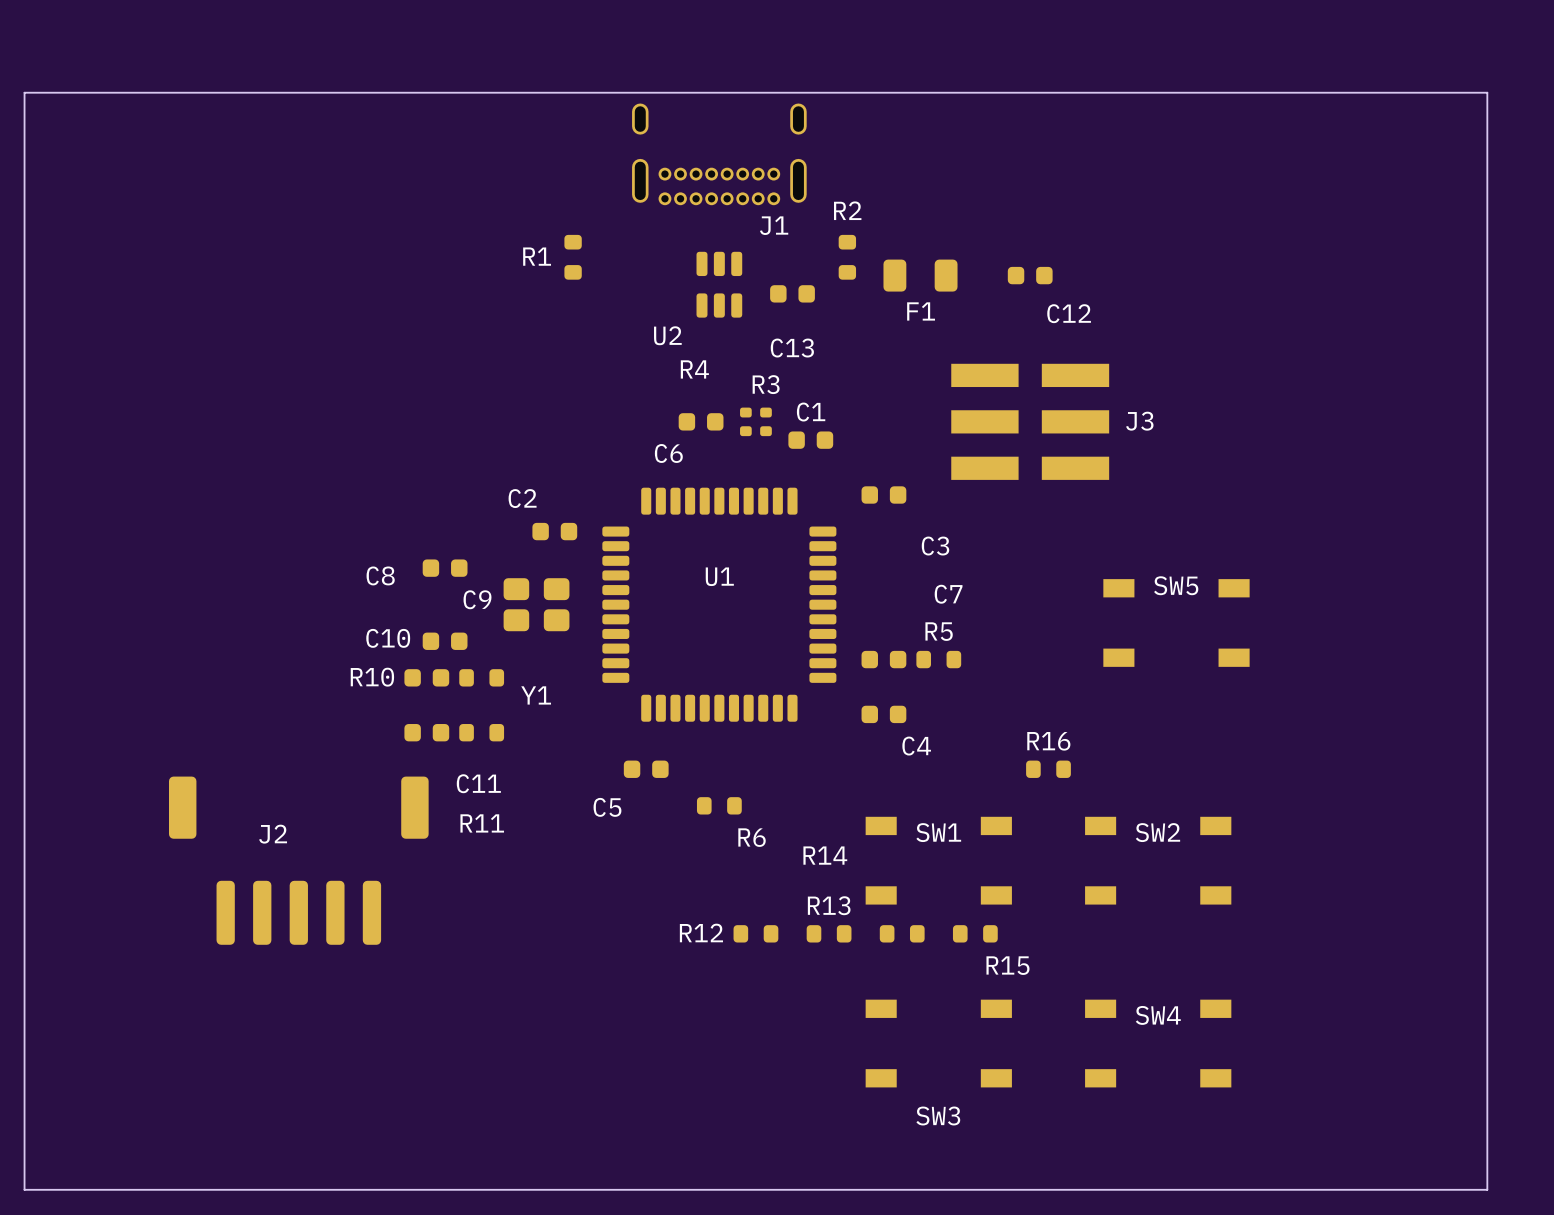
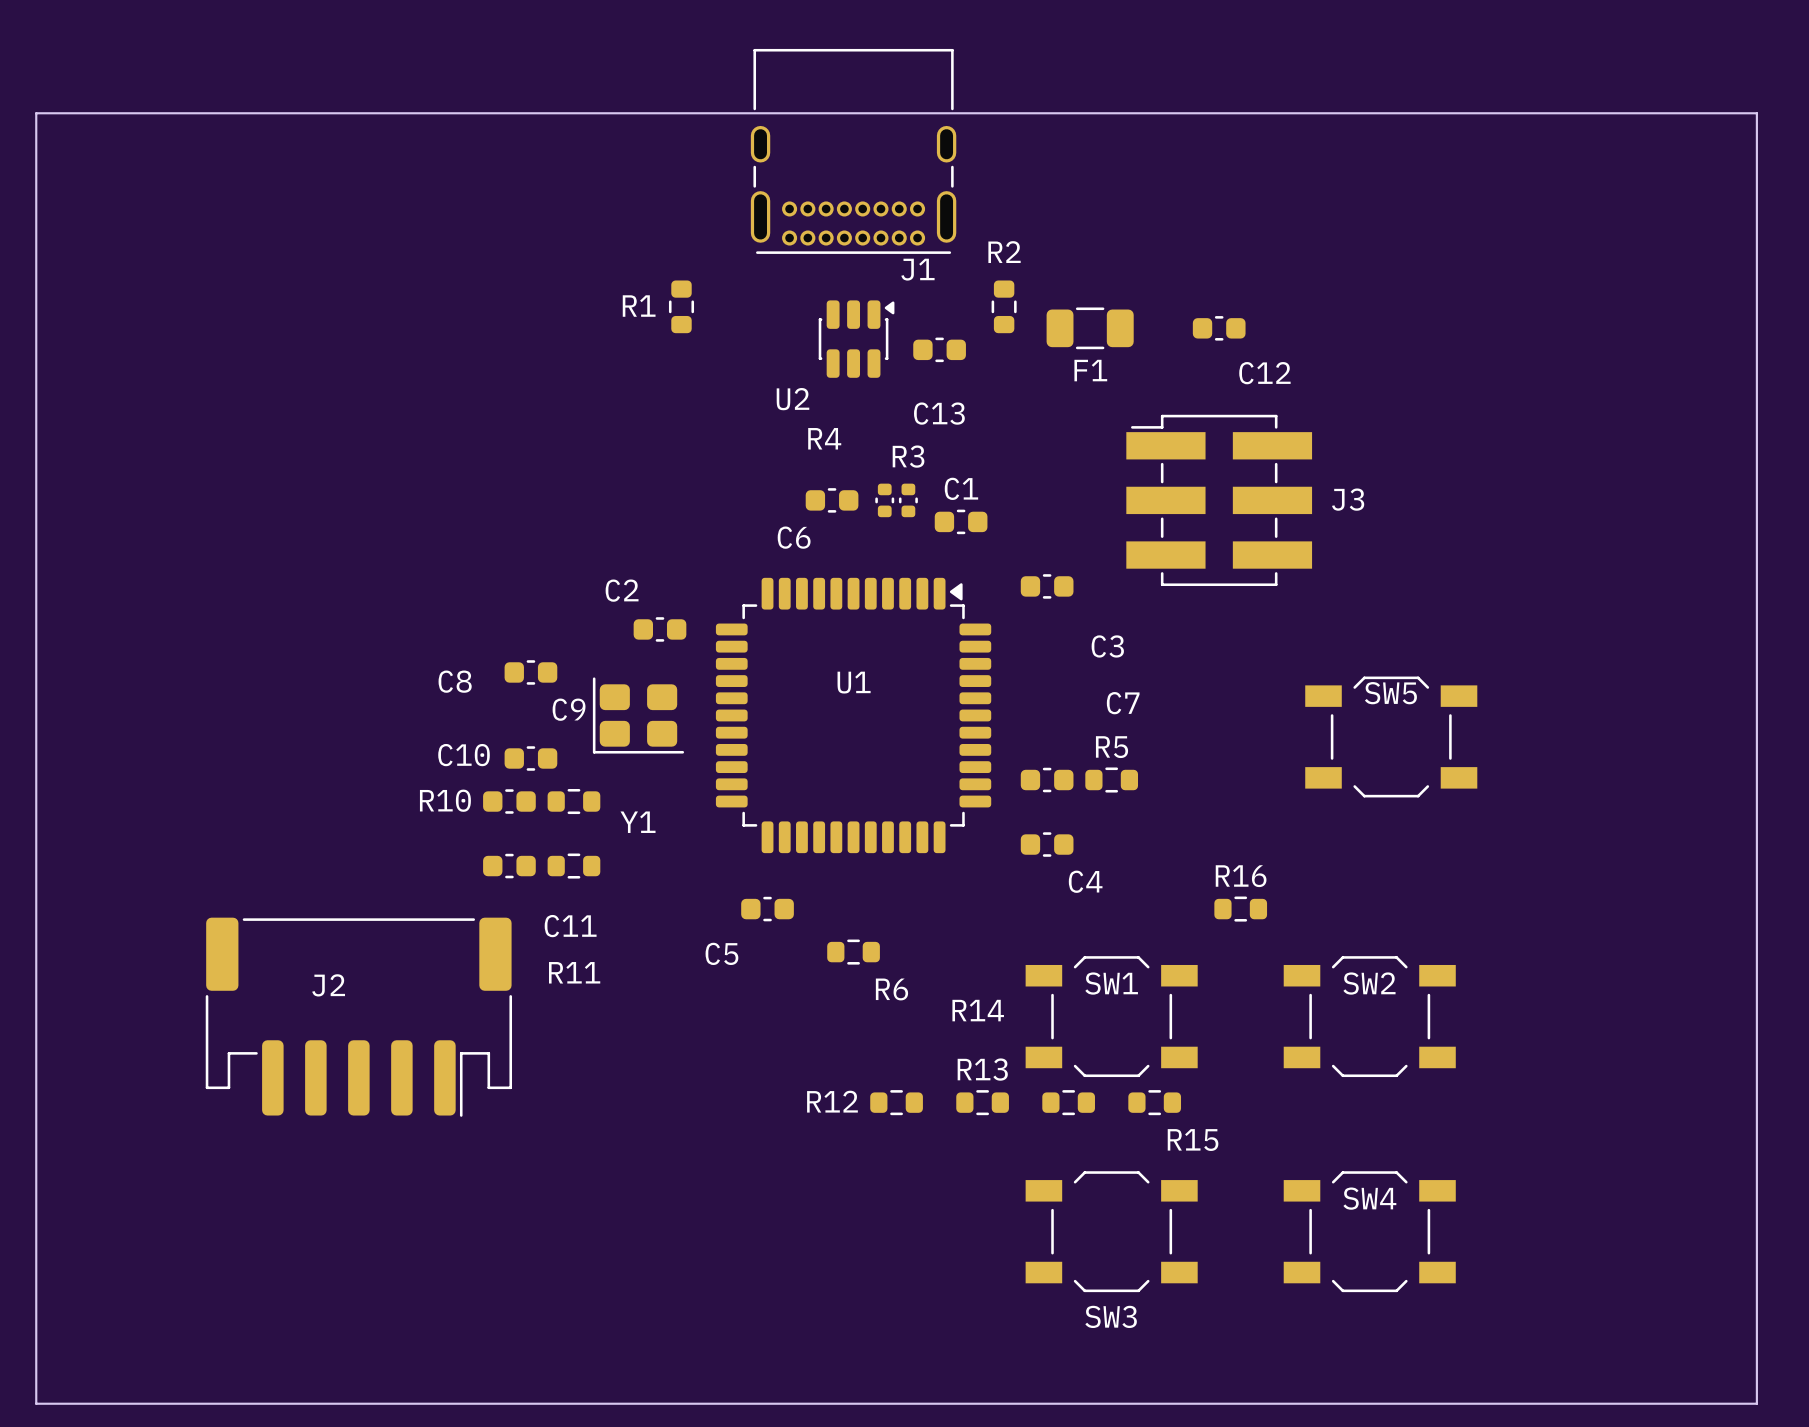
J1 footprint: [632, 103, 807, 206] -> [750, 48, 957, 254]
R1 footprint: [564, 234, 582, 280] -> [668, 280, 695, 334]
R2 footprint: [838, 234, 857, 280] -> [991, 280, 1017, 334]
U2 footprint: [696, 251, 743, 318] -> [818, 300, 895, 378]
F1 footprint: [883, 259, 958, 292] -> [1046, 307, 1134, 350]
C12 footprint: [1007, 266, 1053, 285] -> [1192, 316, 1246, 341]
C13 footprint: [770, 285, 815, 303] -> [913, 337, 966, 363]
J3 footprint: [951, 363, 1110, 480] -> [1126, 414, 1313, 587]
R4 footprint: [740, 407, 752, 437] -> [875, 483, 895, 518]
R3 footprint: [760, 407, 772, 437] -> [898, 483, 918, 518]
C6 footprint: [678, 413, 724, 431] -> [805, 488, 859, 513]
C1 footprint: [788, 431, 834, 449] -> [934, 509, 988, 535]
C3 footprint: [861, 486, 907, 504] -> [1020, 574, 1074, 599]
U1 footprint: [602, 487, 837, 722] -> [715, 577, 992, 854]
C2 footprint: [532, 522, 578, 541] -> [633, 617, 687, 642]
C9 footprint: [422, 559, 468, 577] -> [504, 660, 558, 685]
Y1 footprint: [503, 578, 570, 632] -> [592, 677, 685, 754]
SW5 footprint: [1103, 579, 1250, 667] -> [1305, 676, 1478, 798]
C8 footprint: [422, 632, 468, 650] -> [504, 746, 558, 771]
C7 footprint: [861, 650, 907, 669] -> [1020, 767, 1074, 793]
R5 footprint: [916, 650, 962, 669] -> [1085, 767, 1139, 793]
C10 footprint: [404, 669, 450, 687] -> [483, 789, 536, 814]
R10 footprint: [459, 669, 505, 687] -> [547, 788, 601, 815]
C4 footprint: [861, 705, 907, 724] -> [1020, 832, 1074, 857]
C11 footprint: [404, 724, 450, 742] -> [483, 853, 536, 879]
R11 footprint: [459, 724, 505, 742] -> [547, 853, 601, 879]
C5 footprint: [623, 760, 669, 778] -> [741, 896, 794, 922]
R16 footprint: [1026, 760, 1071, 778] -> [1214, 896, 1268, 922]
J2 footprint: [168, 776, 429, 945] -> [205, 917, 513, 1117]
R6 footprint: [696, 797, 742, 815] -> [827, 939, 880, 965]
SW1 footprint: [865, 816, 1012, 905] -> [1025, 956, 1198, 1078]
SW2 footprint: [1085, 816, 1232, 905] -> [1283, 956, 1456, 1078]
R12 footprint: [733, 925, 779, 943] -> [870, 1090, 923, 1116]
R13 footprint: [806, 925, 852, 943] -> [956, 1090, 1009, 1116]
R14 footprint: [879, 925, 925, 943] -> [1042, 1090, 1095, 1116]
R15 footprint: [952, 925, 998, 943] -> [1128, 1090, 1182, 1116]
SW3 footprint: [865, 999, 1012, 1088] -> [1025, 1171, 1198, 1293]
SW4 footprint: [1085, 999, 1232, 1088] -> [1283, 1171, 1456, 1293]

